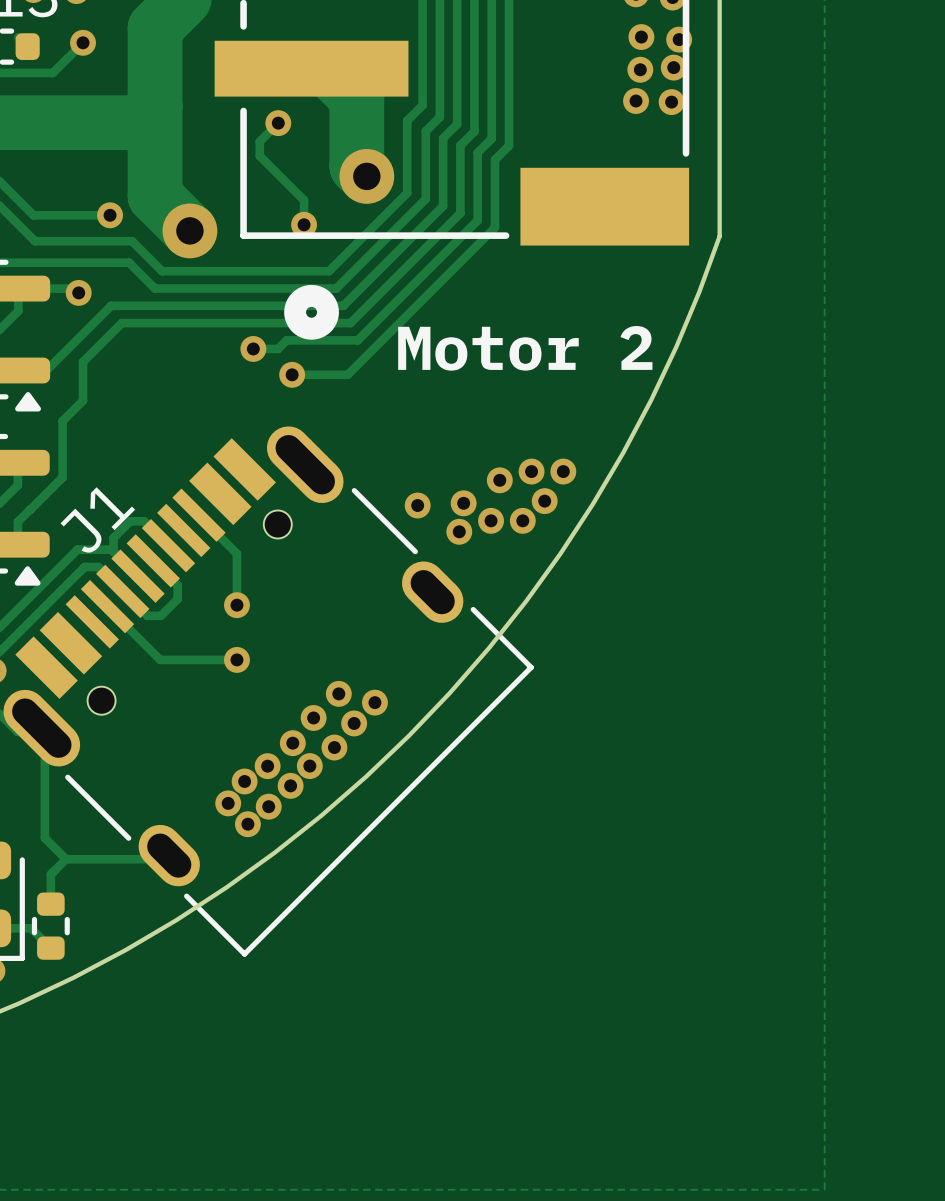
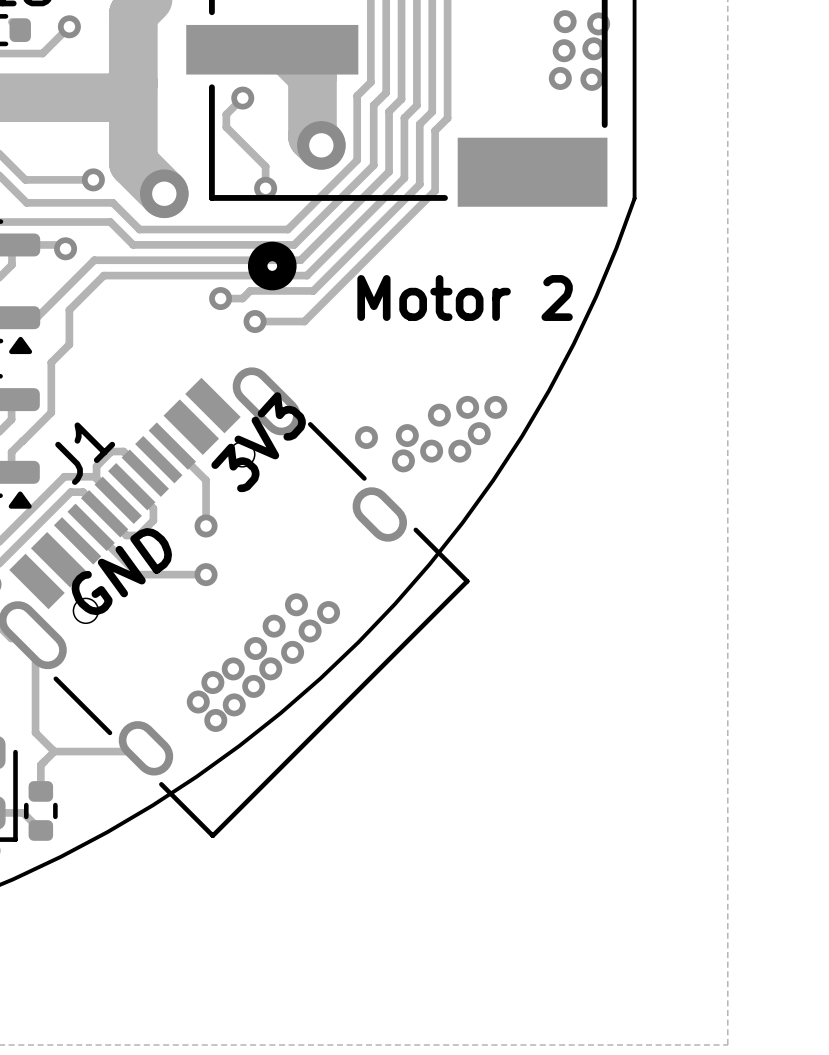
text: none -> 3V3 (258, 442)
text: none -> GND (121, 571)

